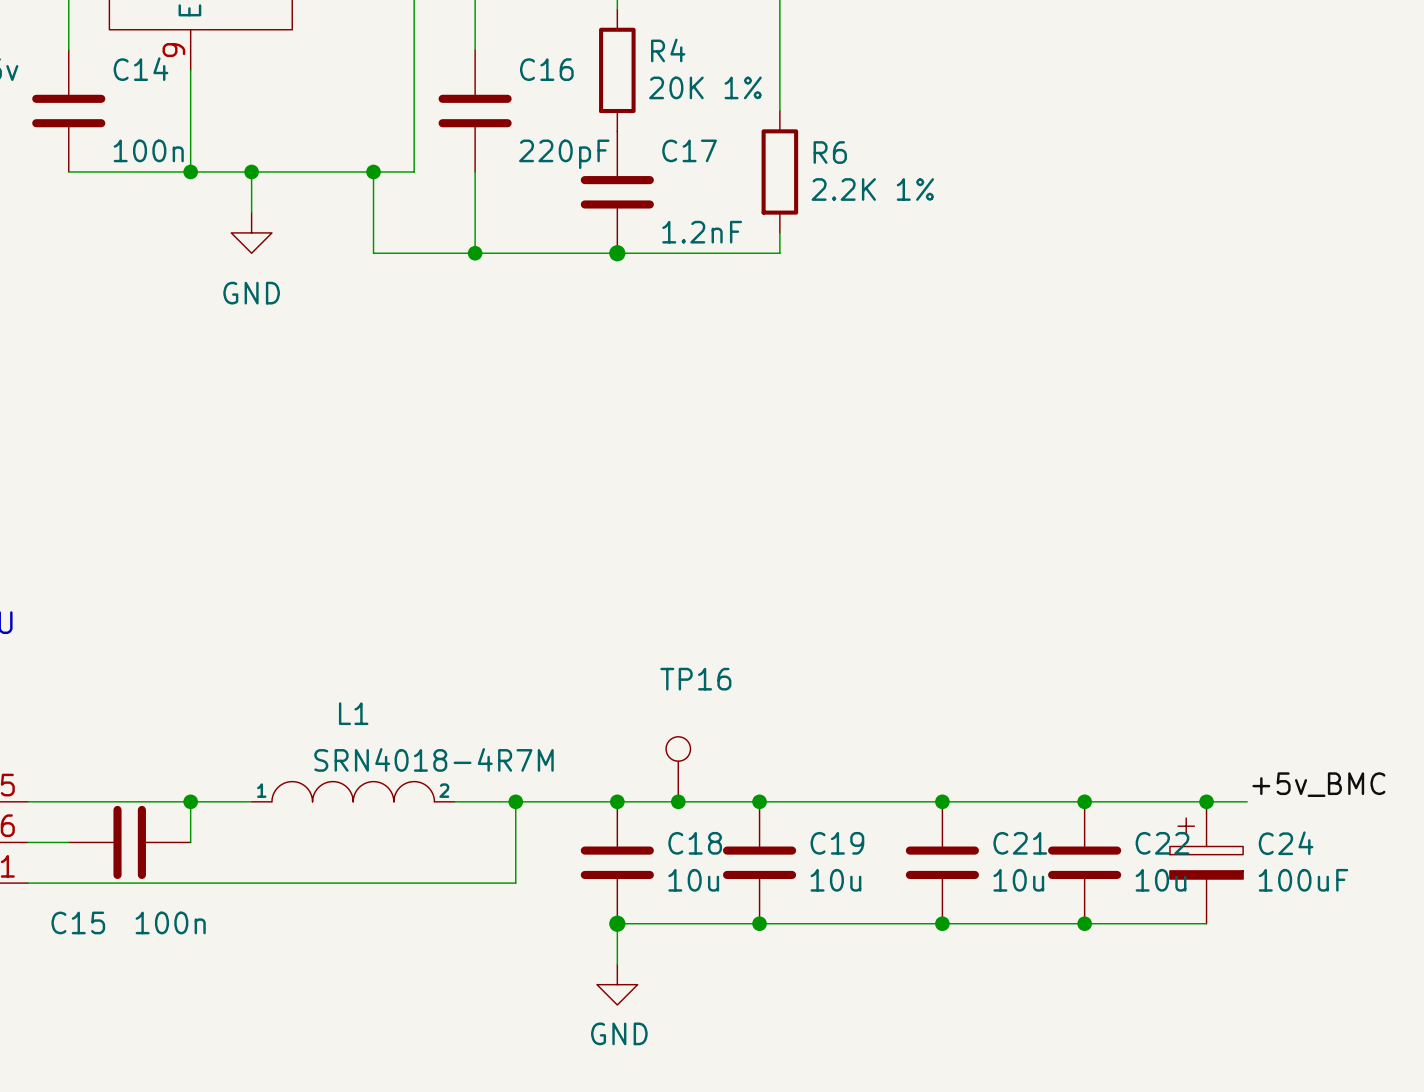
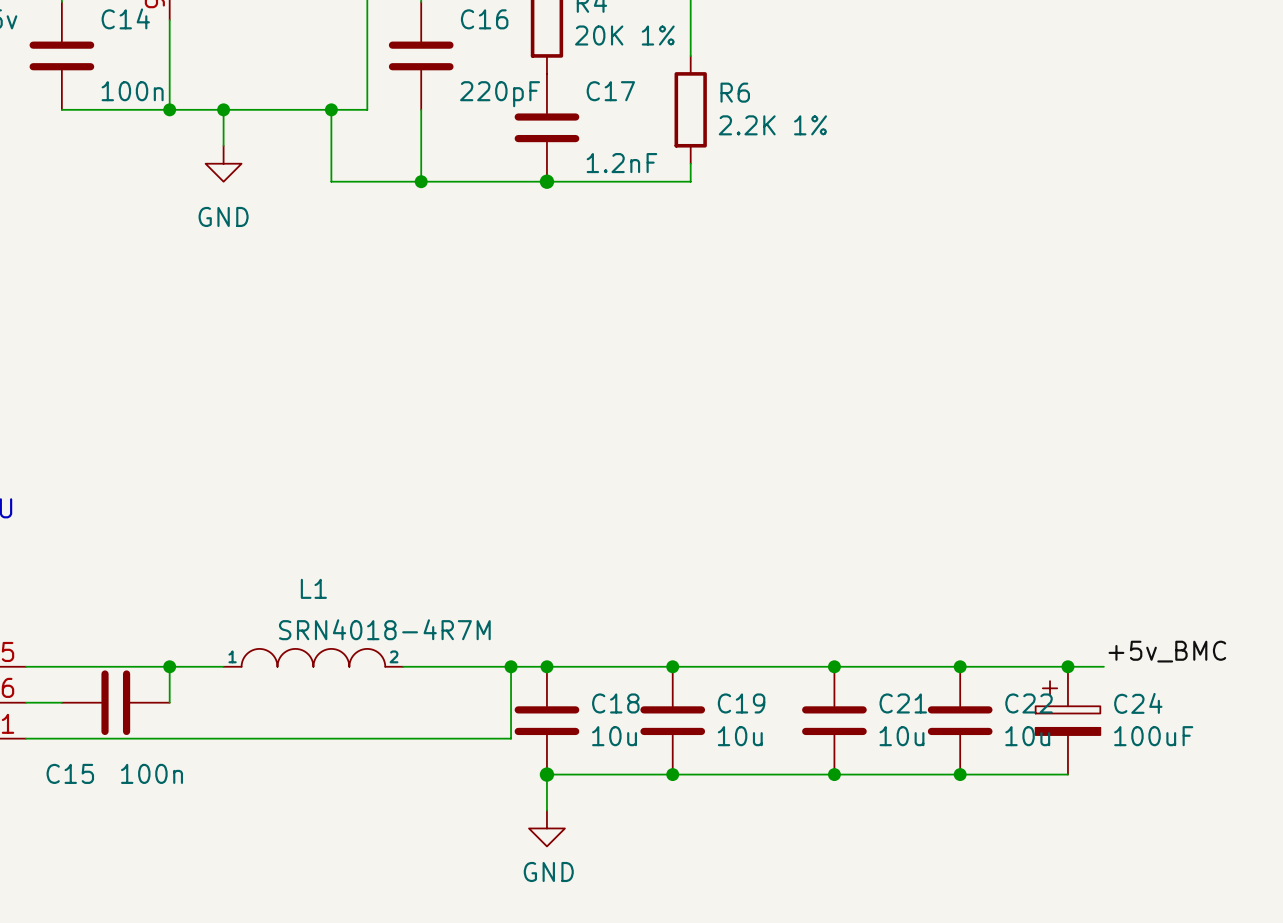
TP16: (678, 769) -> none
wire: (515, 801) (515, 883) -> (511, 666) (511, 738) (457, 738)
junction: (515, 801) -> none
junction: none -> (511, 666)
junction: (678, 801) -> none

